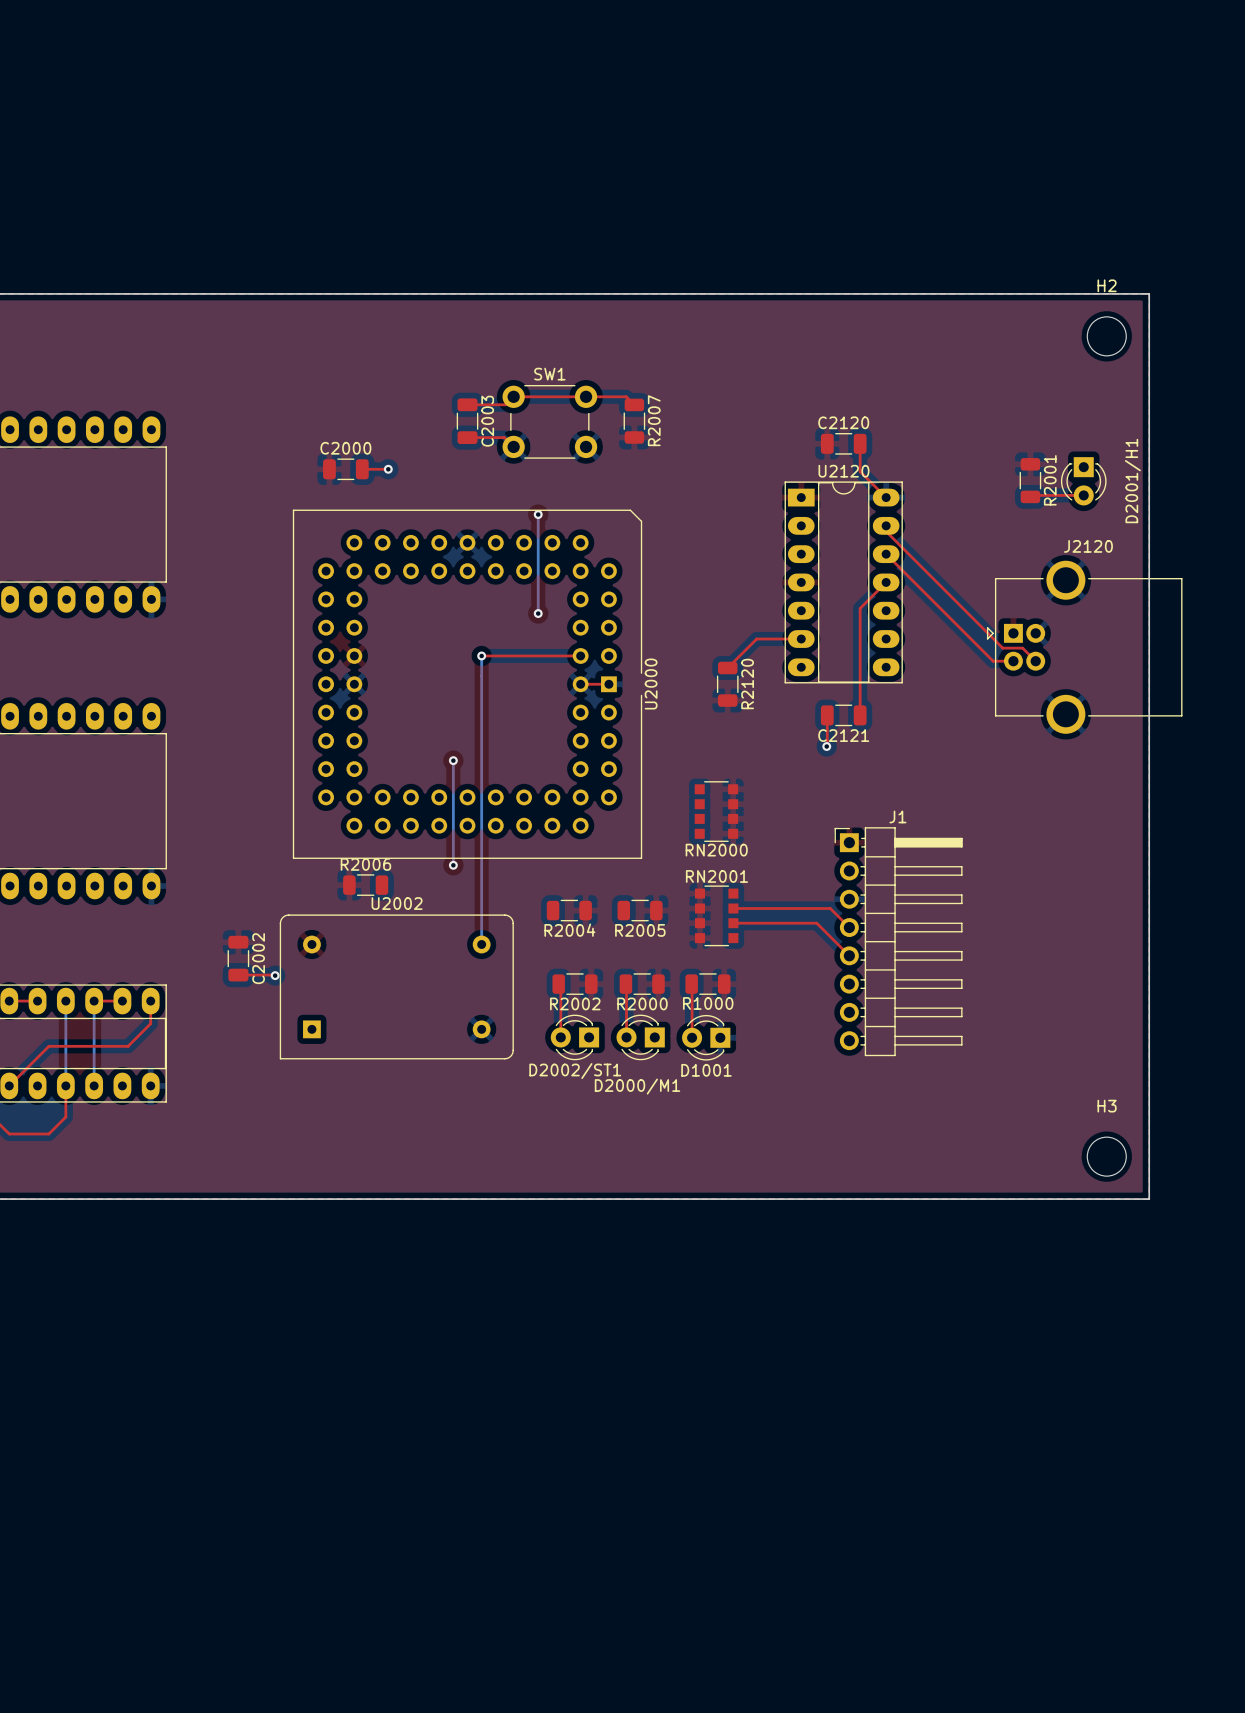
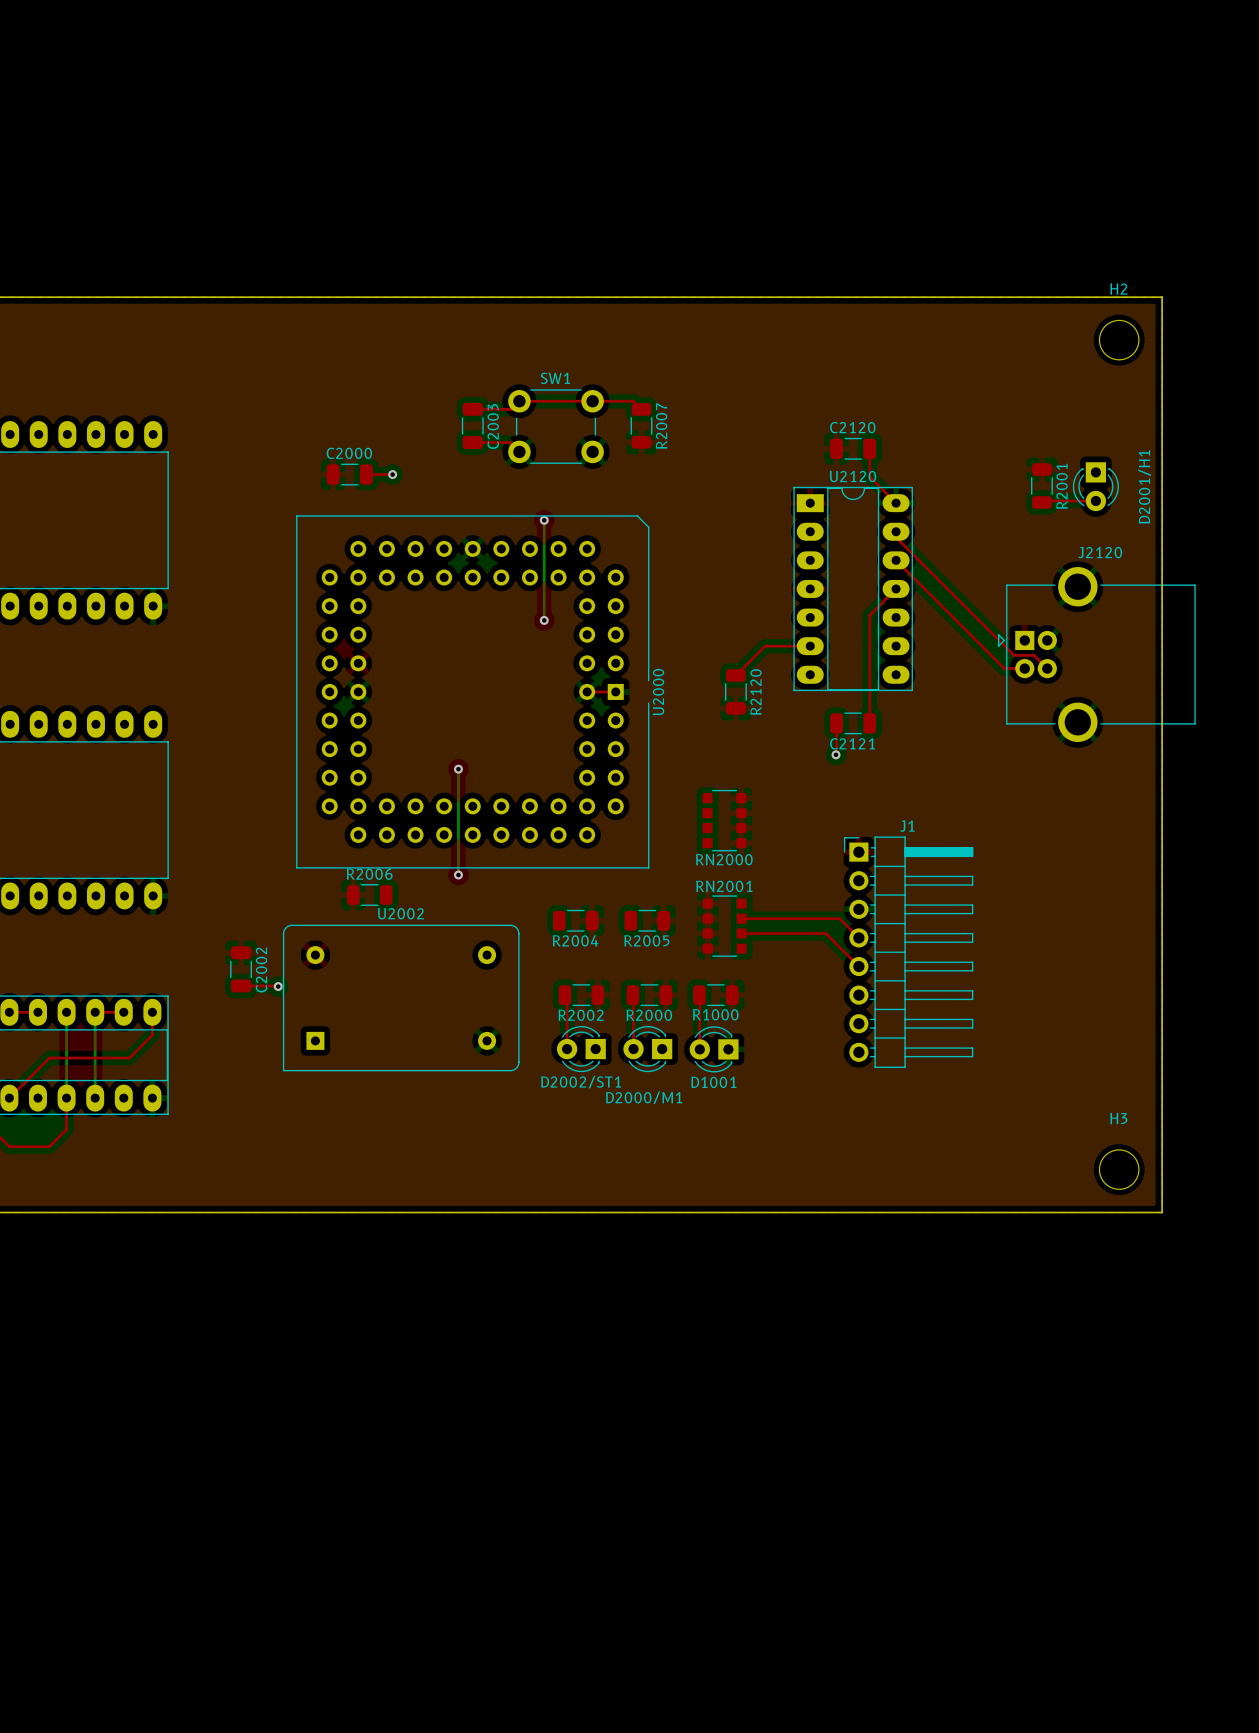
bottom track: (481, 655) (481, 944) -> none
top track: (481, 655) (580, 655) -> none
via: (481, 655) -> none

